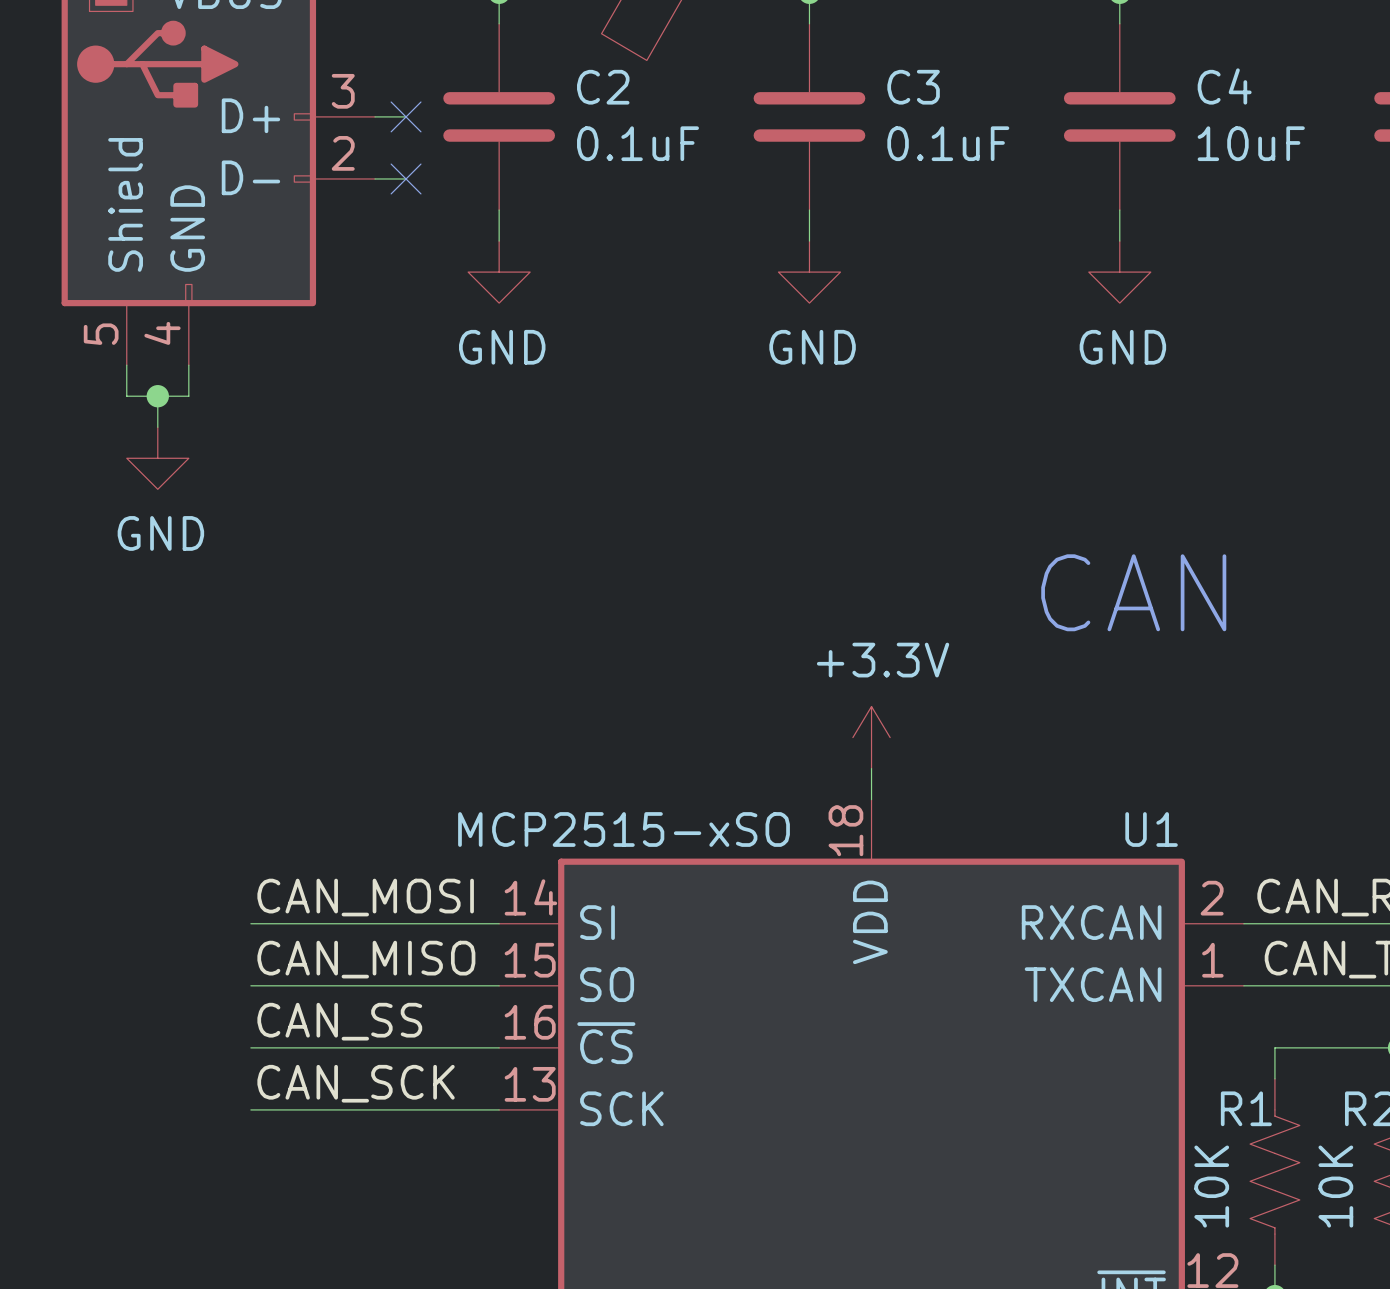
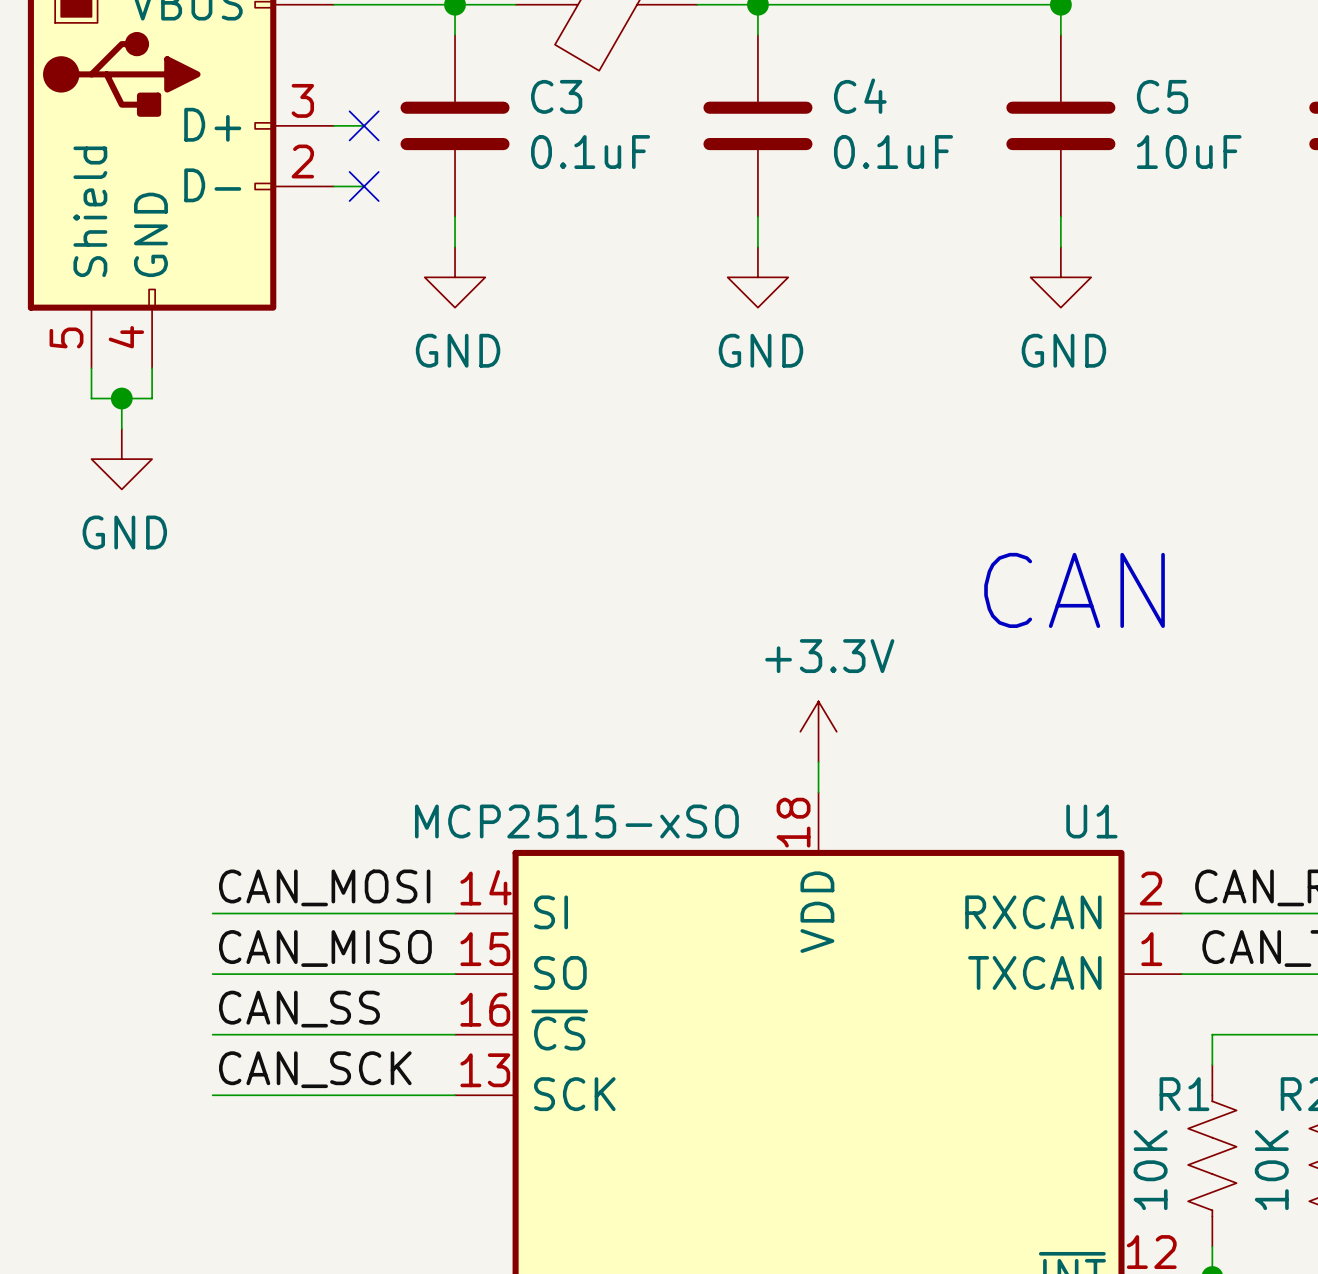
C4 name: C4 (1224, 86) -> C5 (1162, 96)
C2 name: C2 (603, 87) -> C3 (556, 96)
C3 name: C3 (913, 87) -> C4 (860, 96)

